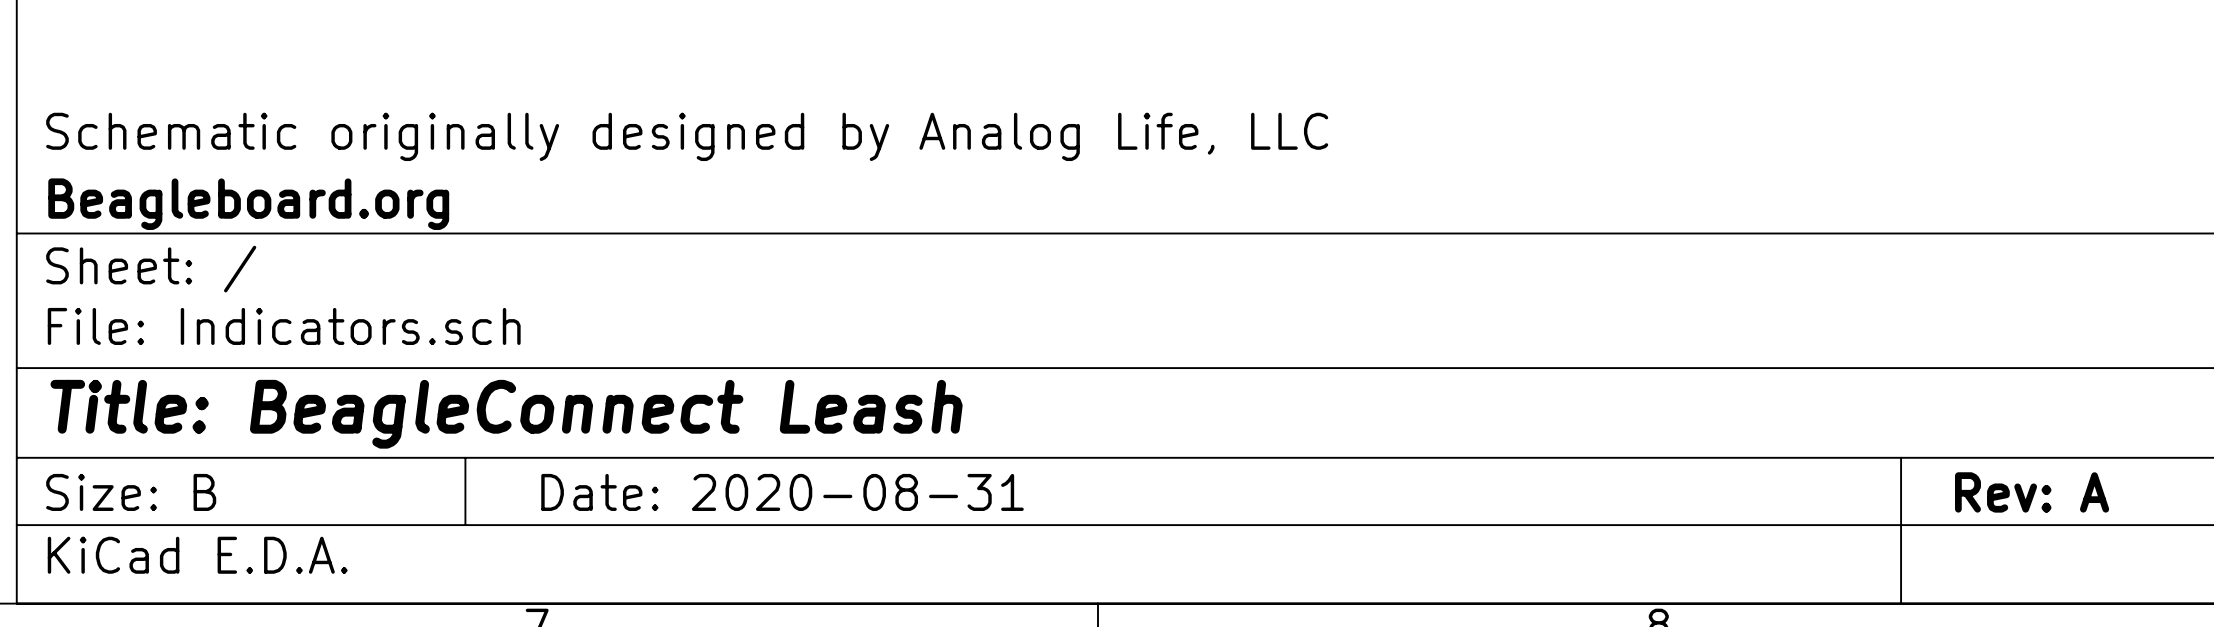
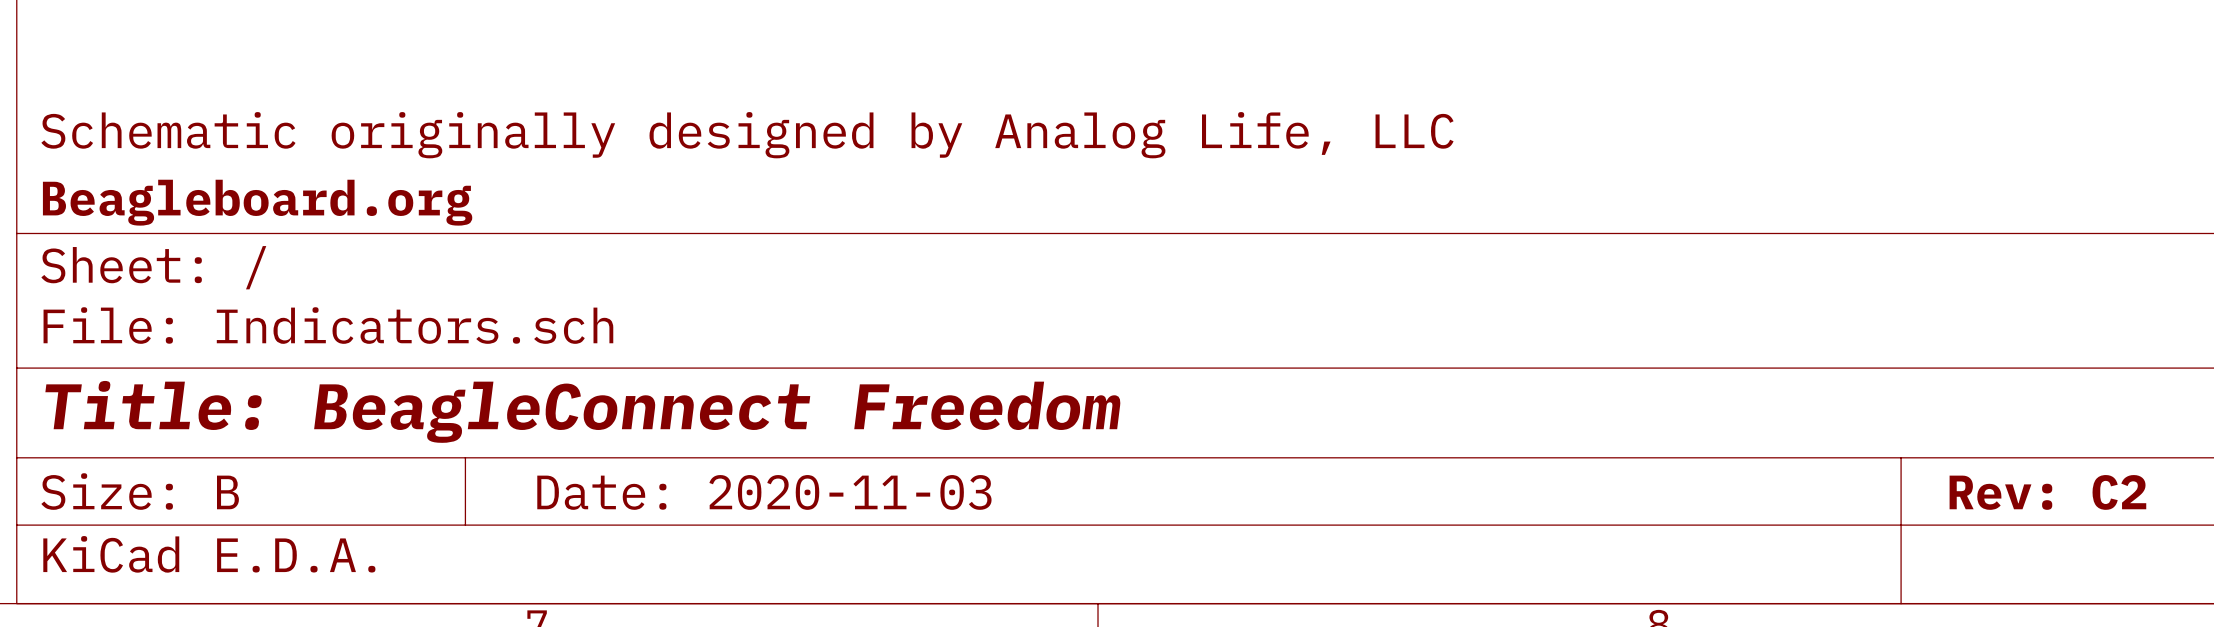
title block: Title: BeagleConnect Leash (506, 414) -> Title: BeagleConnect Freedom (583, 411)
title block: Date: 2020-08-31 (782, 492) -> Date: 2020-11-03 (764, 492)
title block: Rev: A (2032, 492) -> Rev: C2 (2047, 492)

